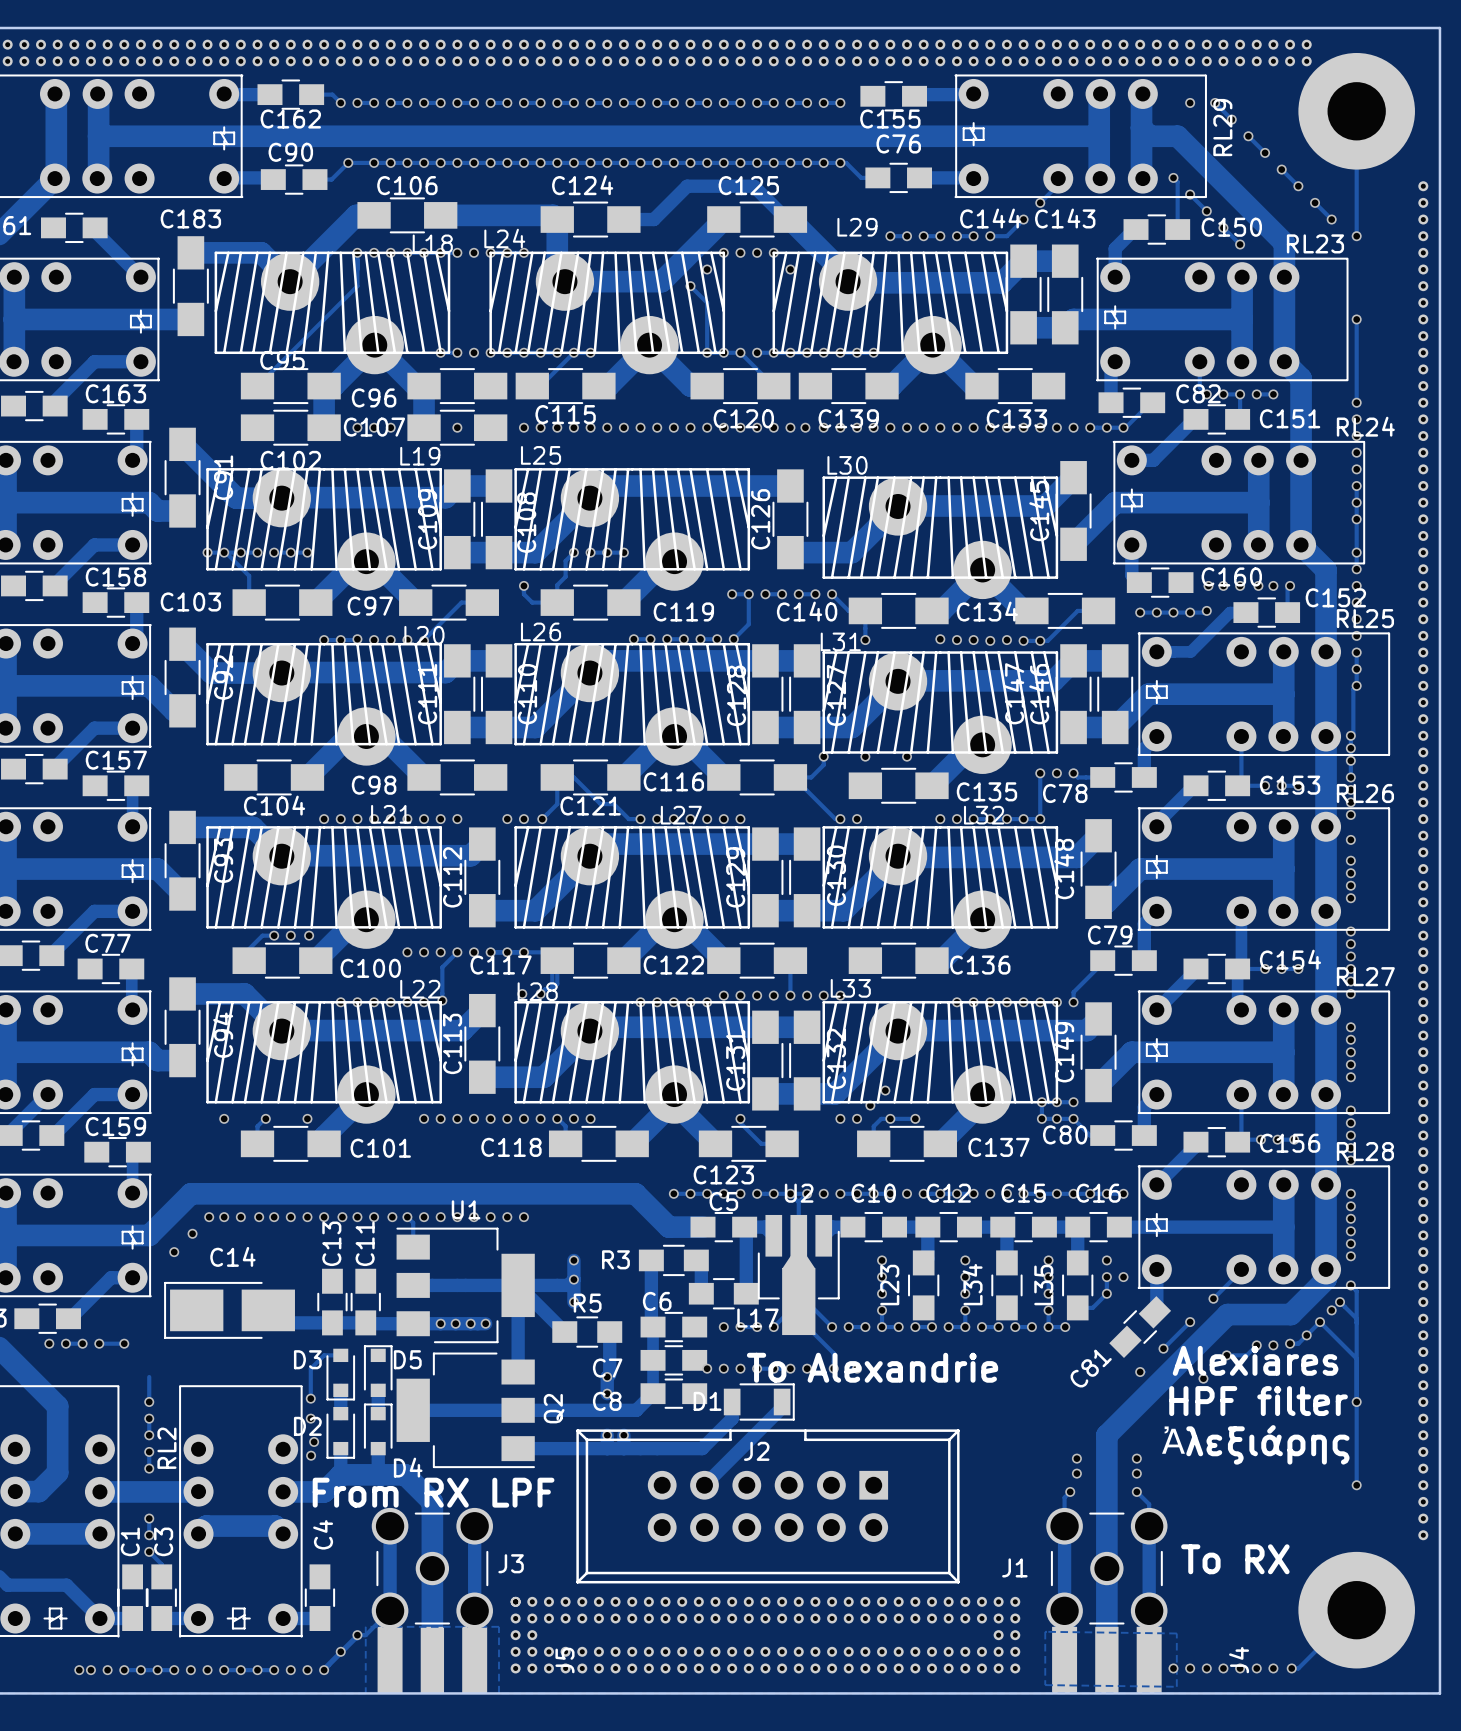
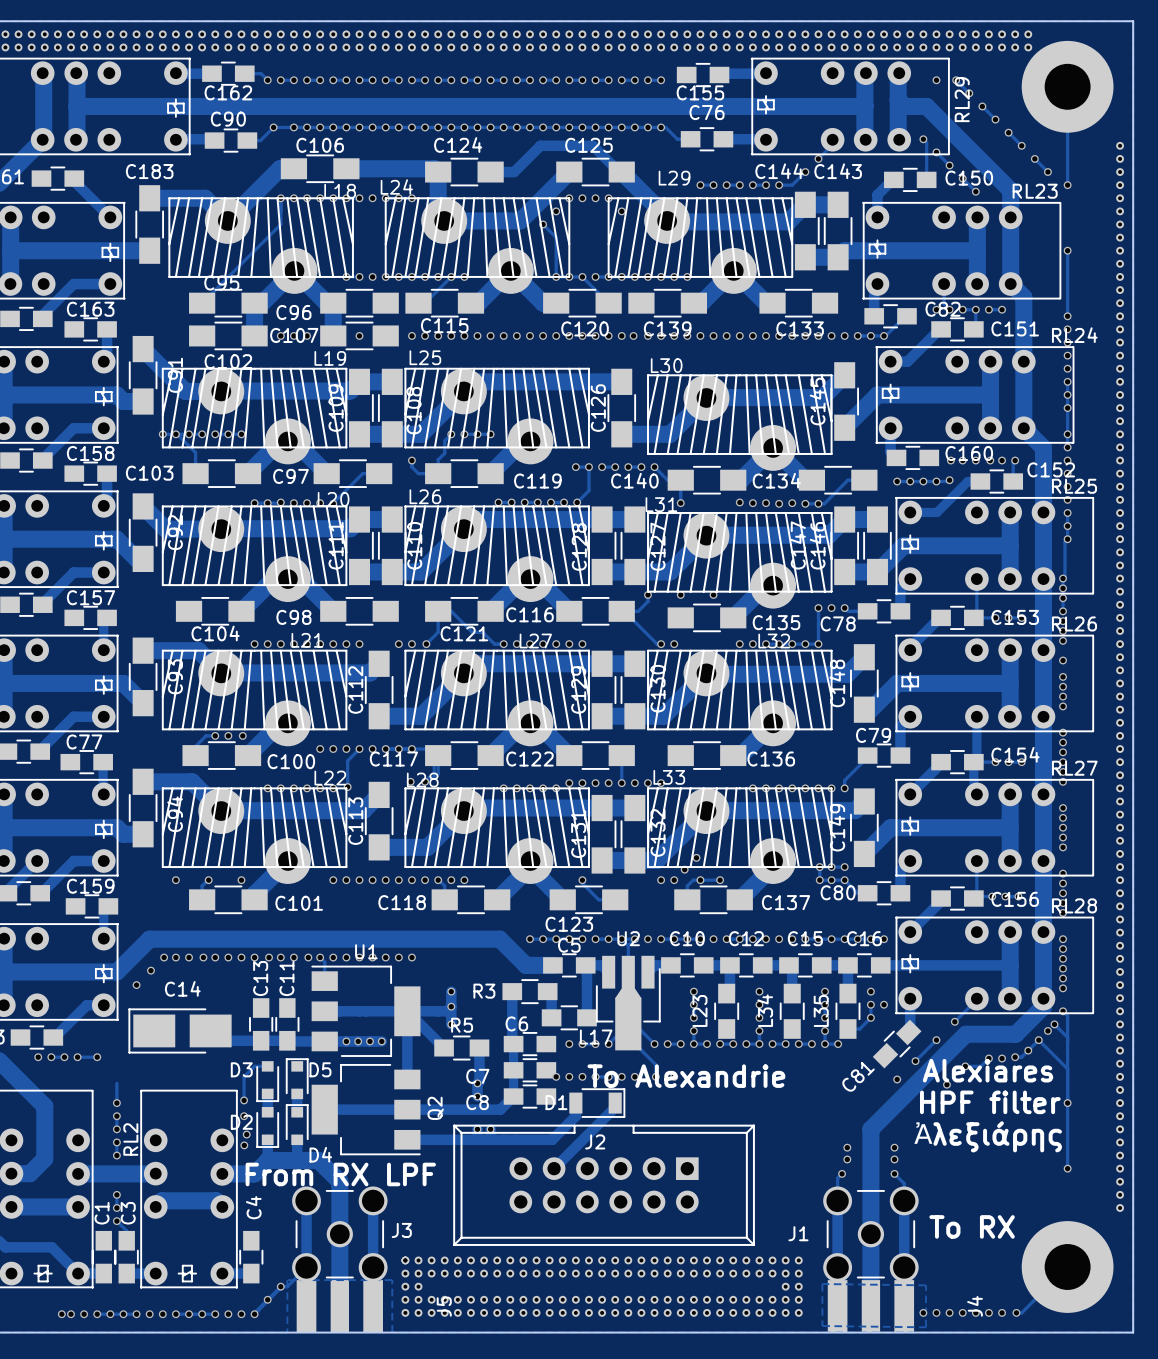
via: none -> (936, 309)

